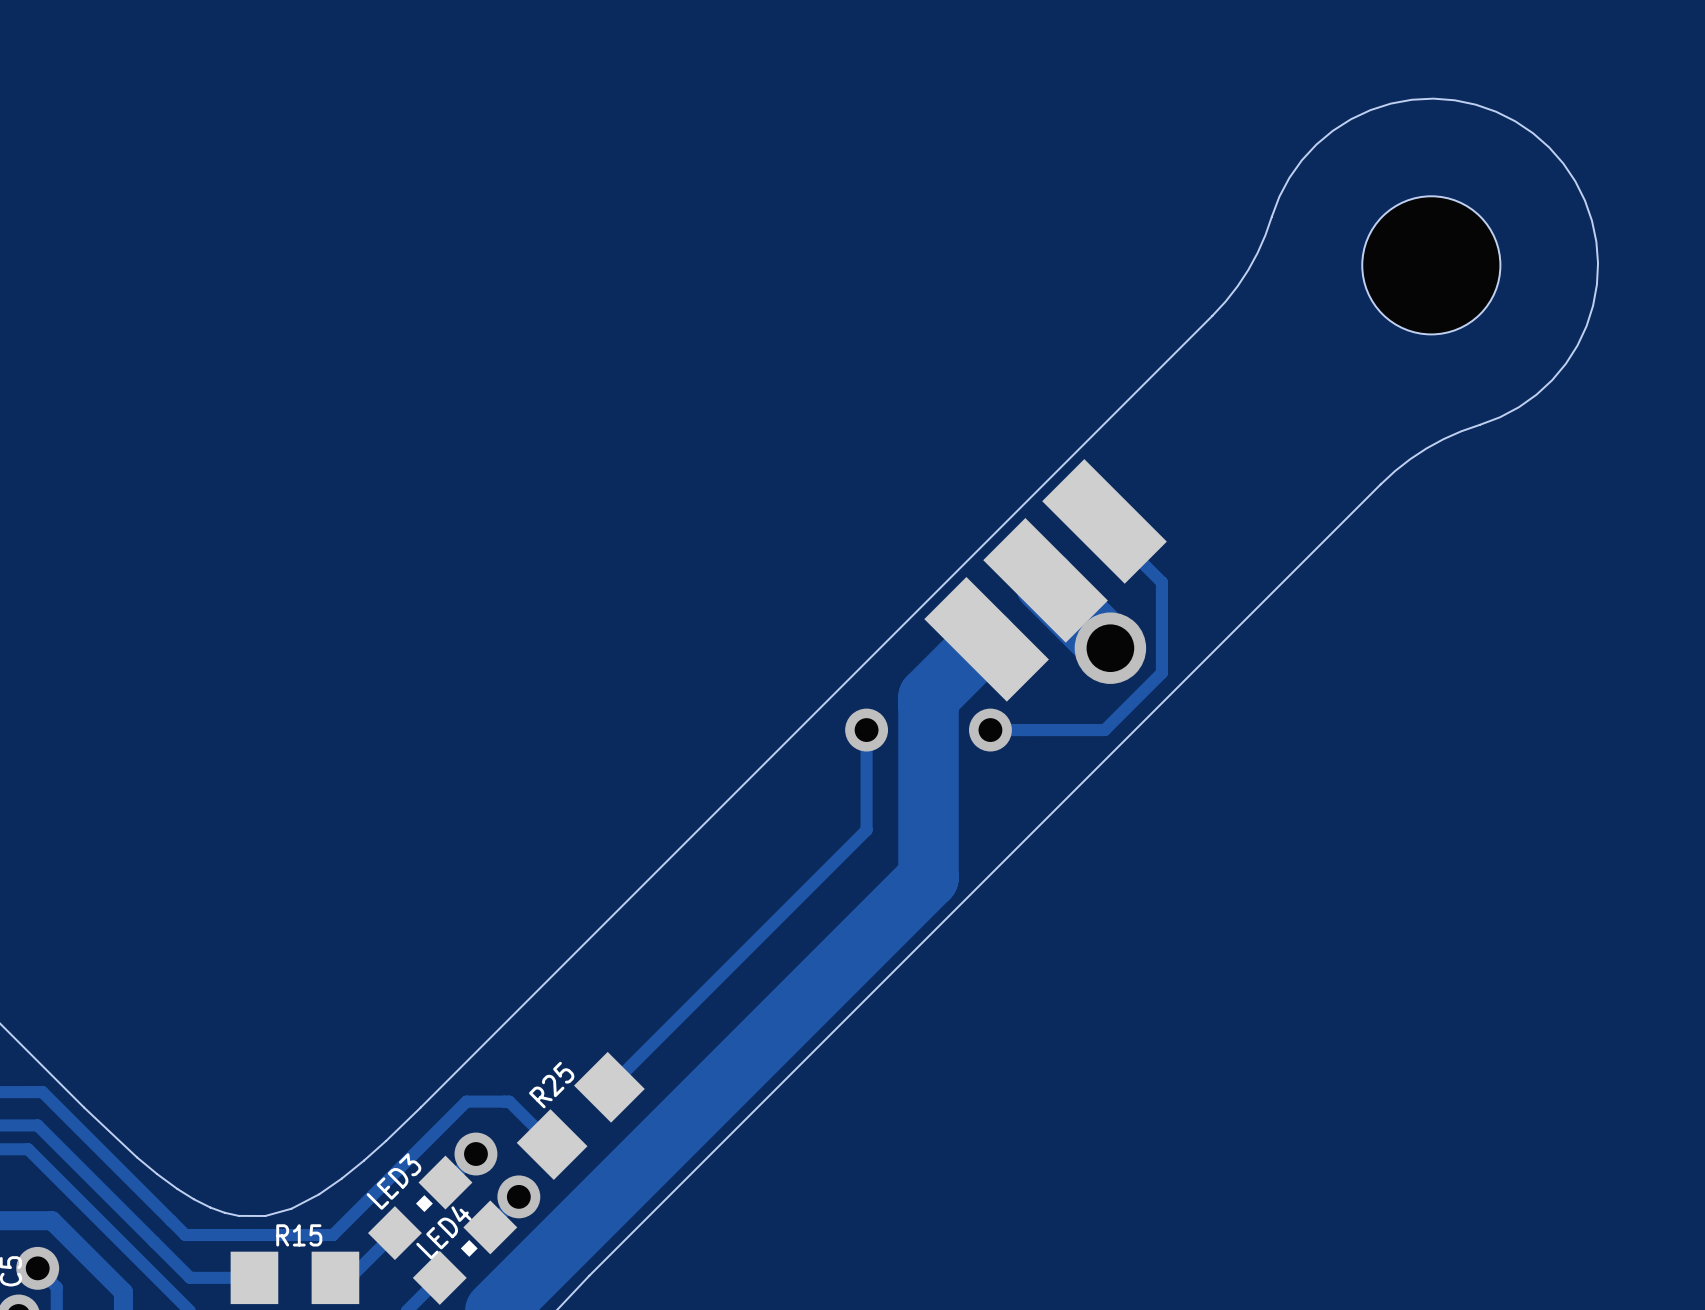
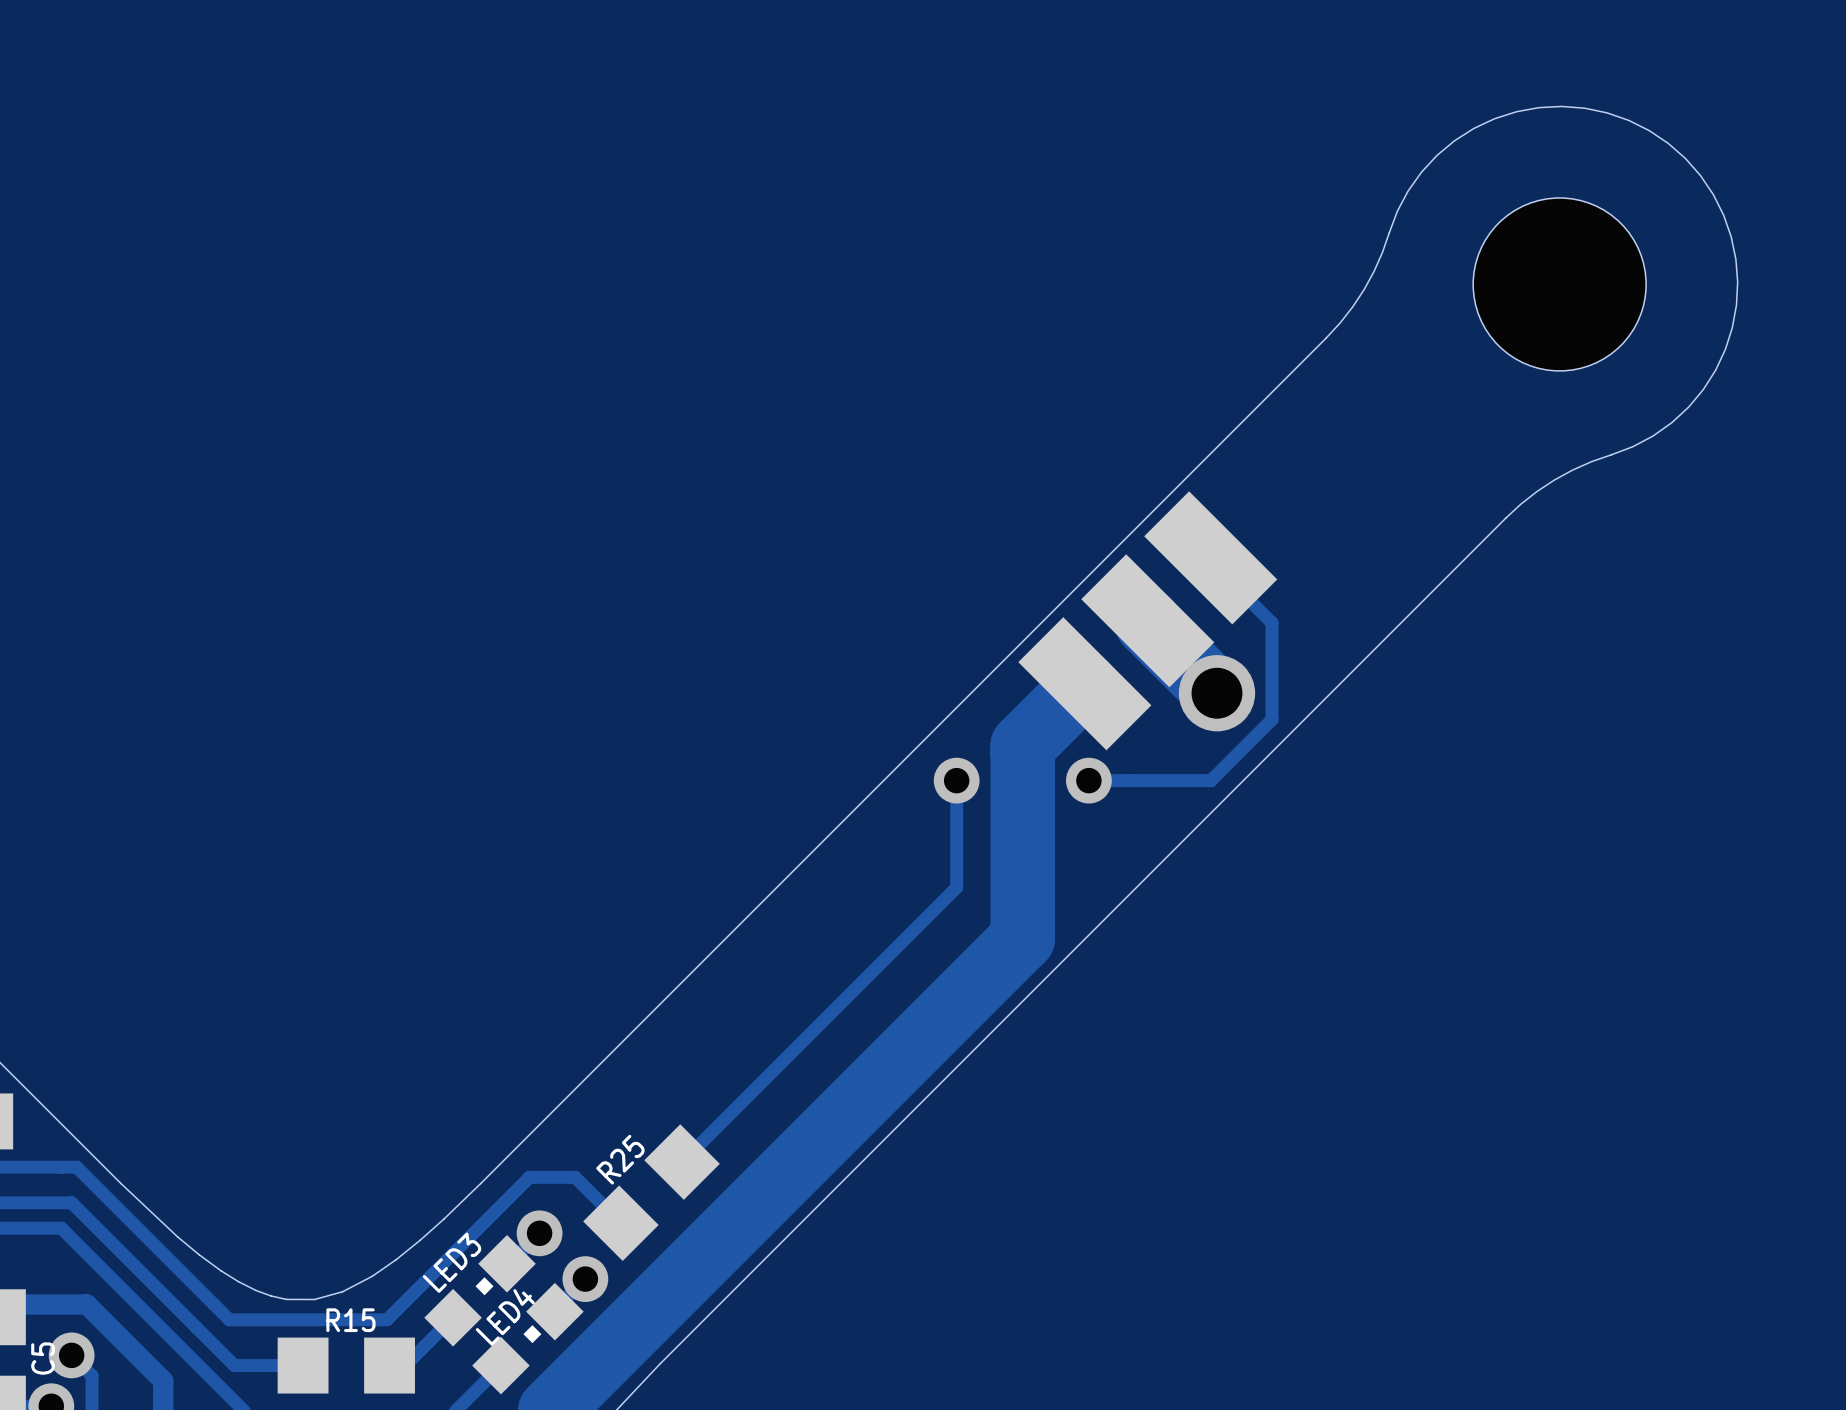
hole size: [1362, 196, 1501, 335] -> [1473, 197, 1647, 371]

